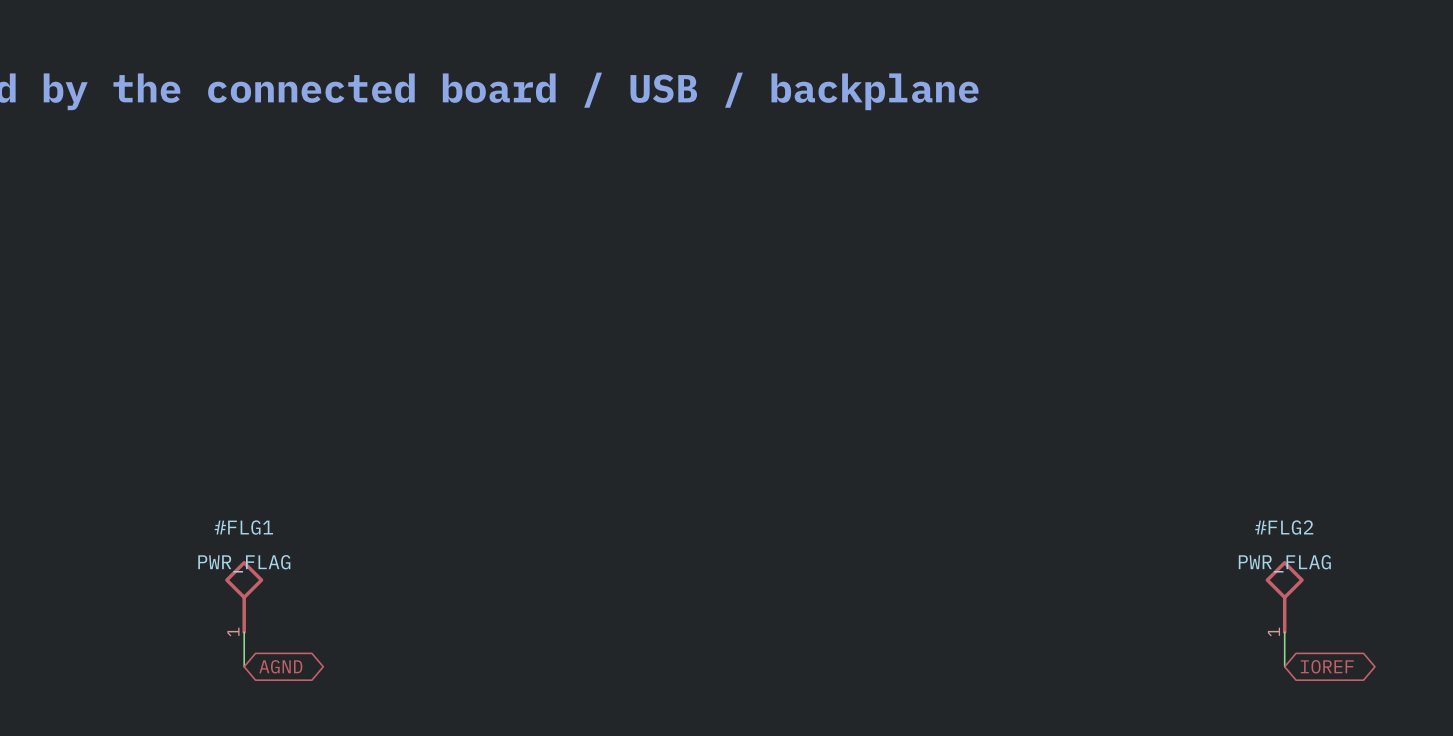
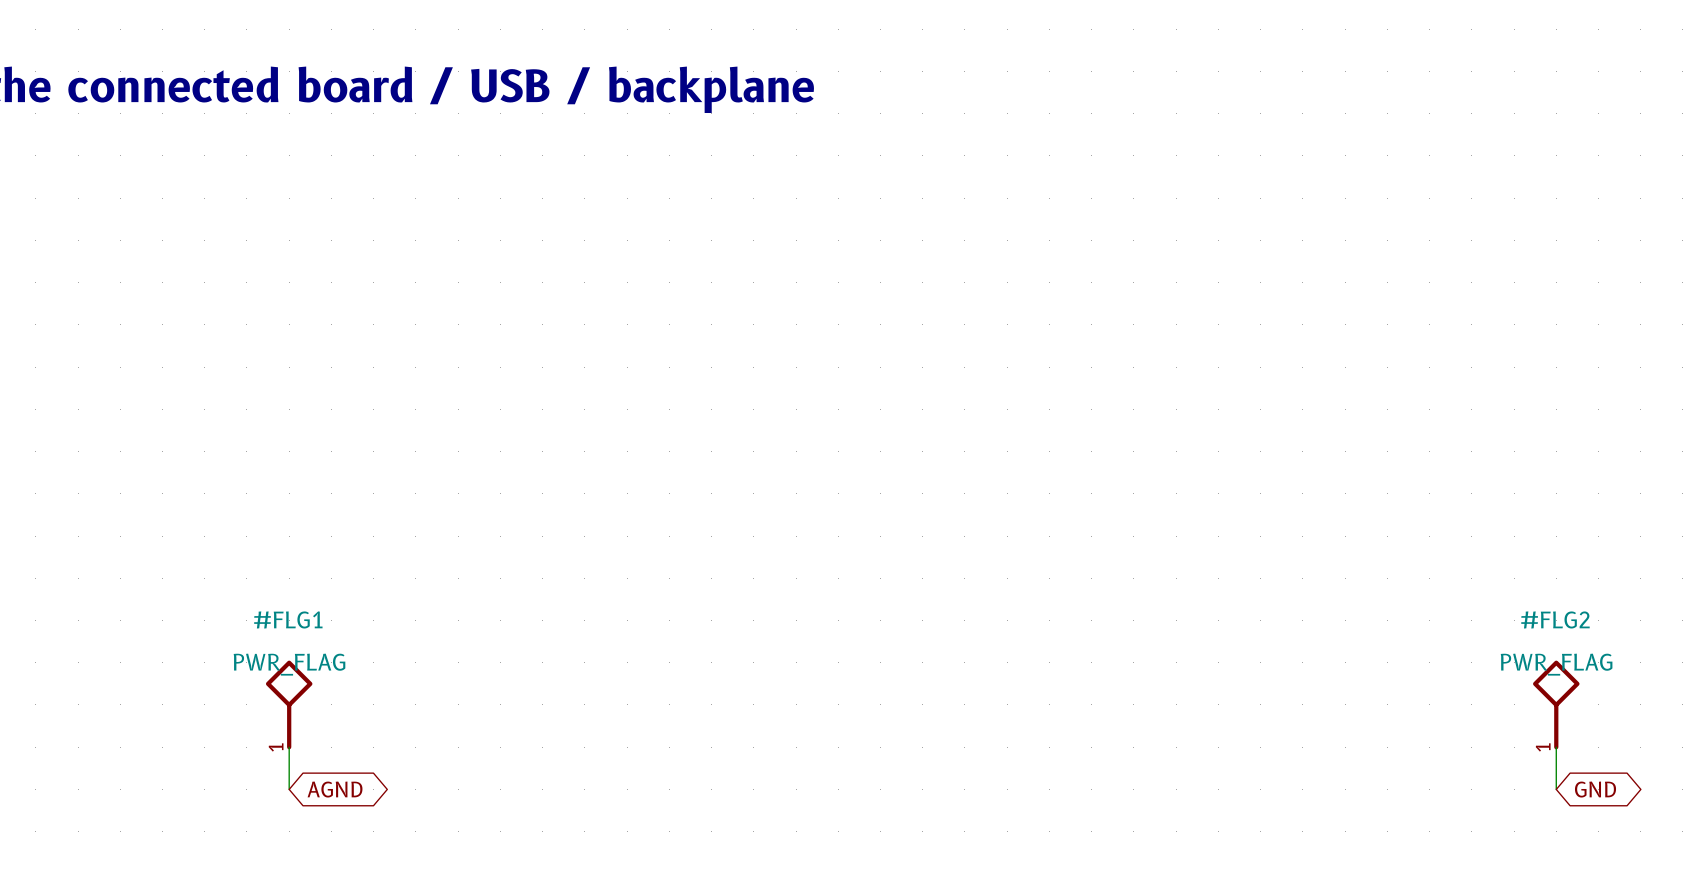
global label: IOREF (1327, 666) -> GND (1595, 789)

